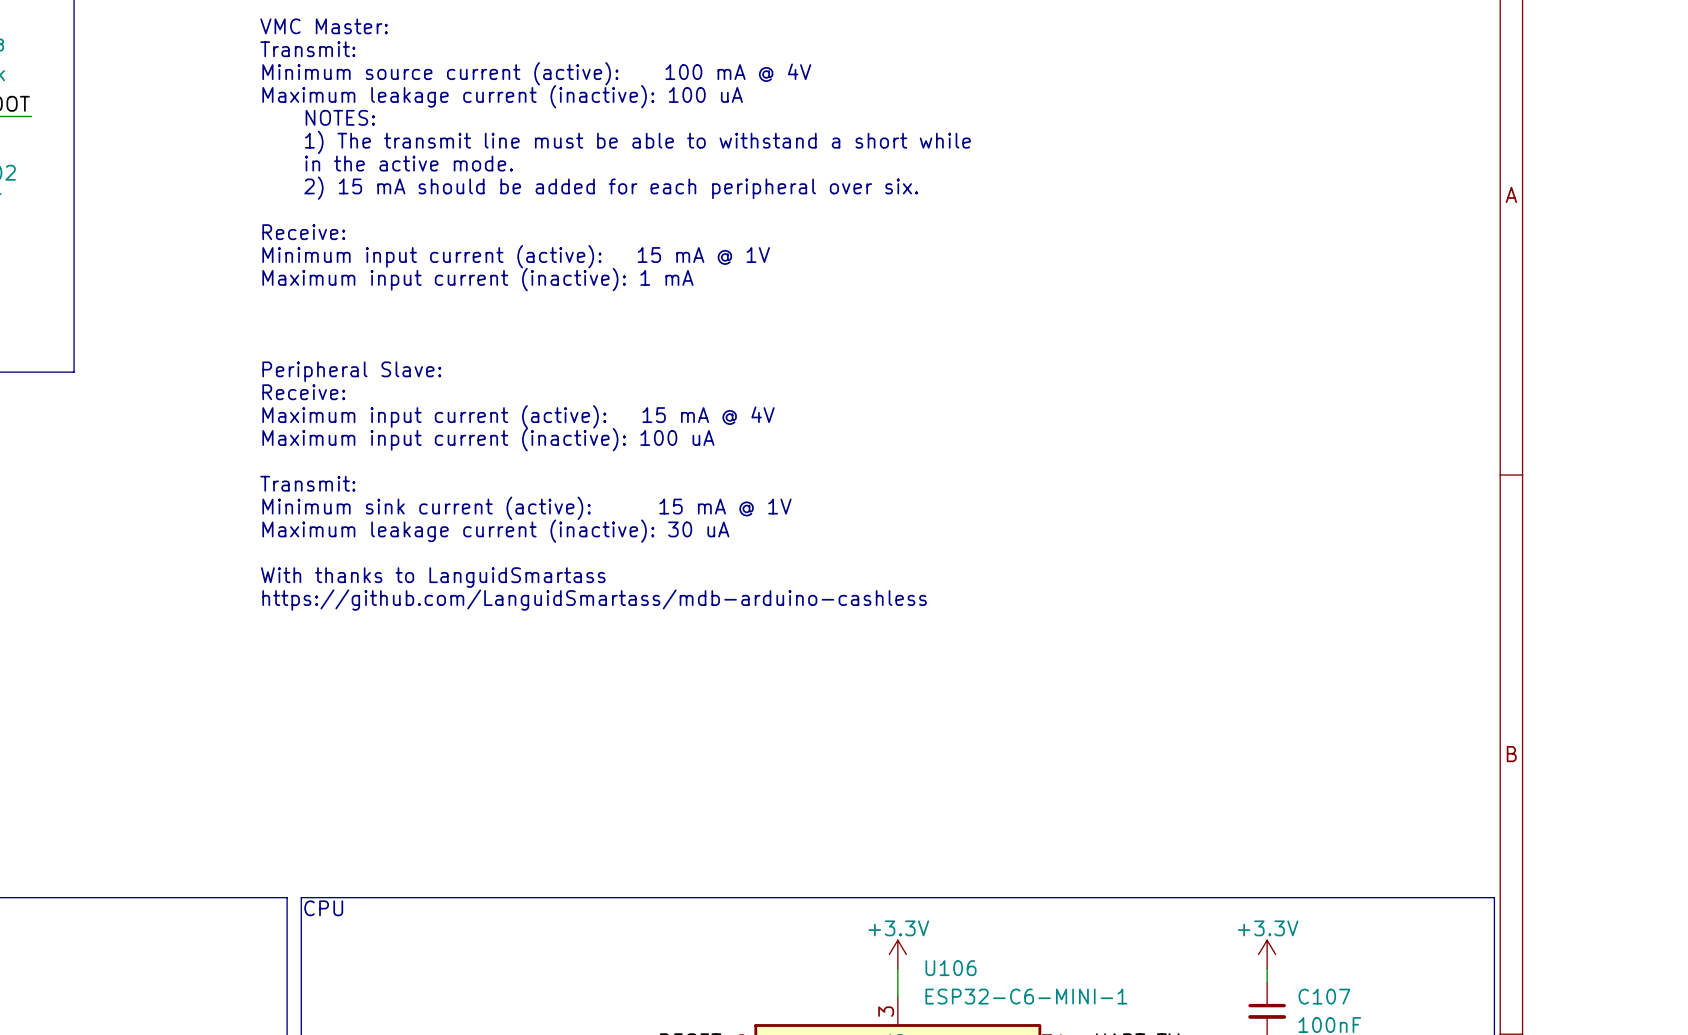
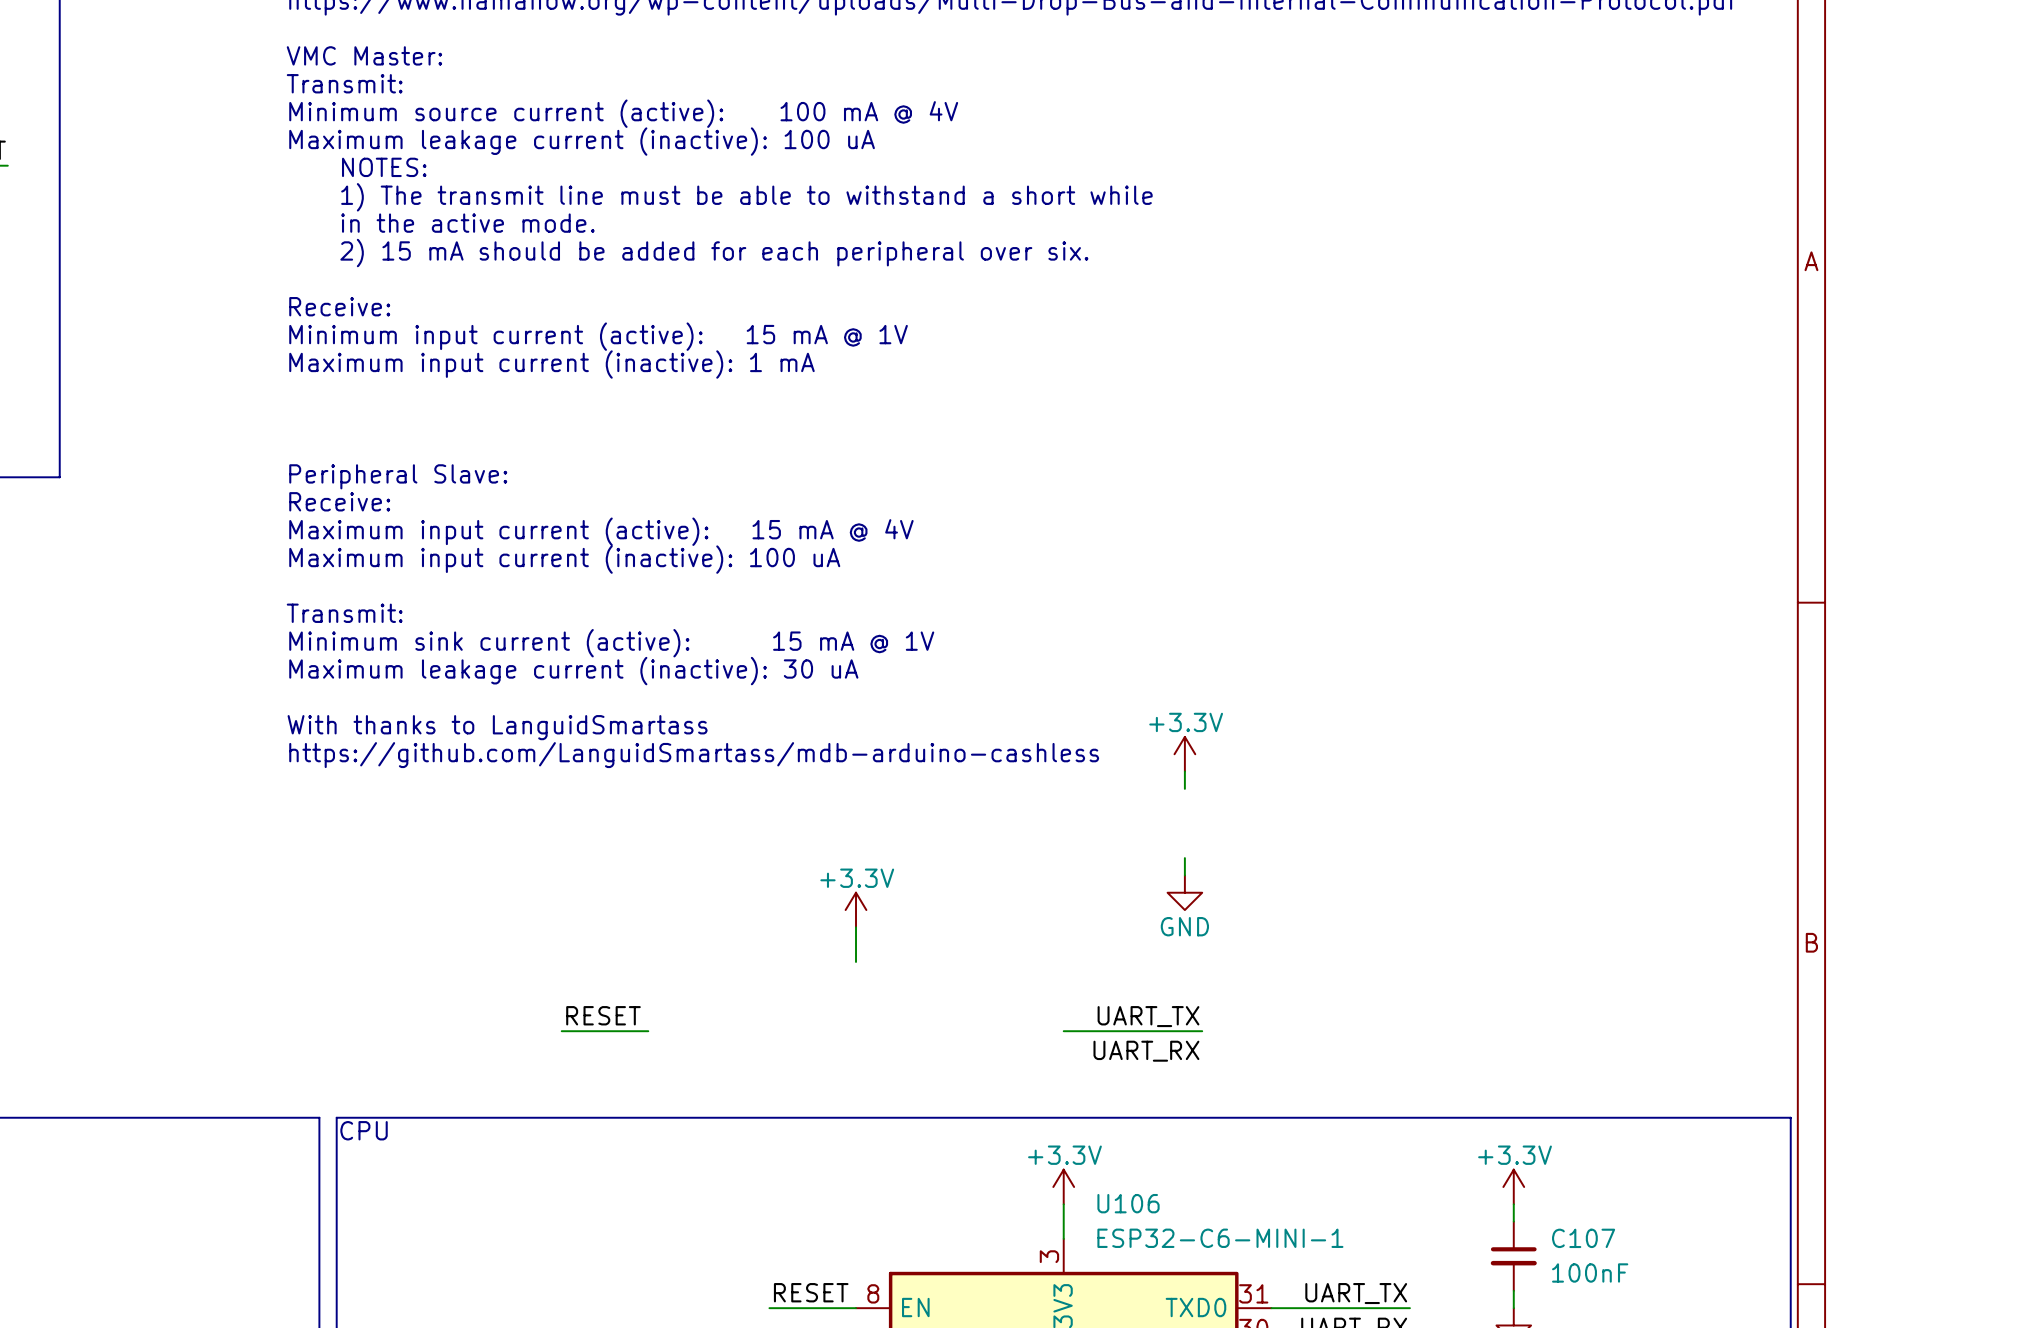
power symbol: none -> +3.3V (1184, 754)
wire: none -> (1184, 771) (1184, 788)
wire: none -> (1184, 858) (1184, 875)
power symbol: none -> GND (1184, 892)
power symbol: none -> +3.3V (856, 910)
wire: none -> (856, 927) (856, 961)
label: none -> RESET (603, 1015)
label: none -> UART_TX (1148, 1016)
wire: none -> (561, 1031) (648, 1031)
wire: none -> (1063, 1031) (1202, 1031)
label: none -> UART_RX (1146, 1051)

